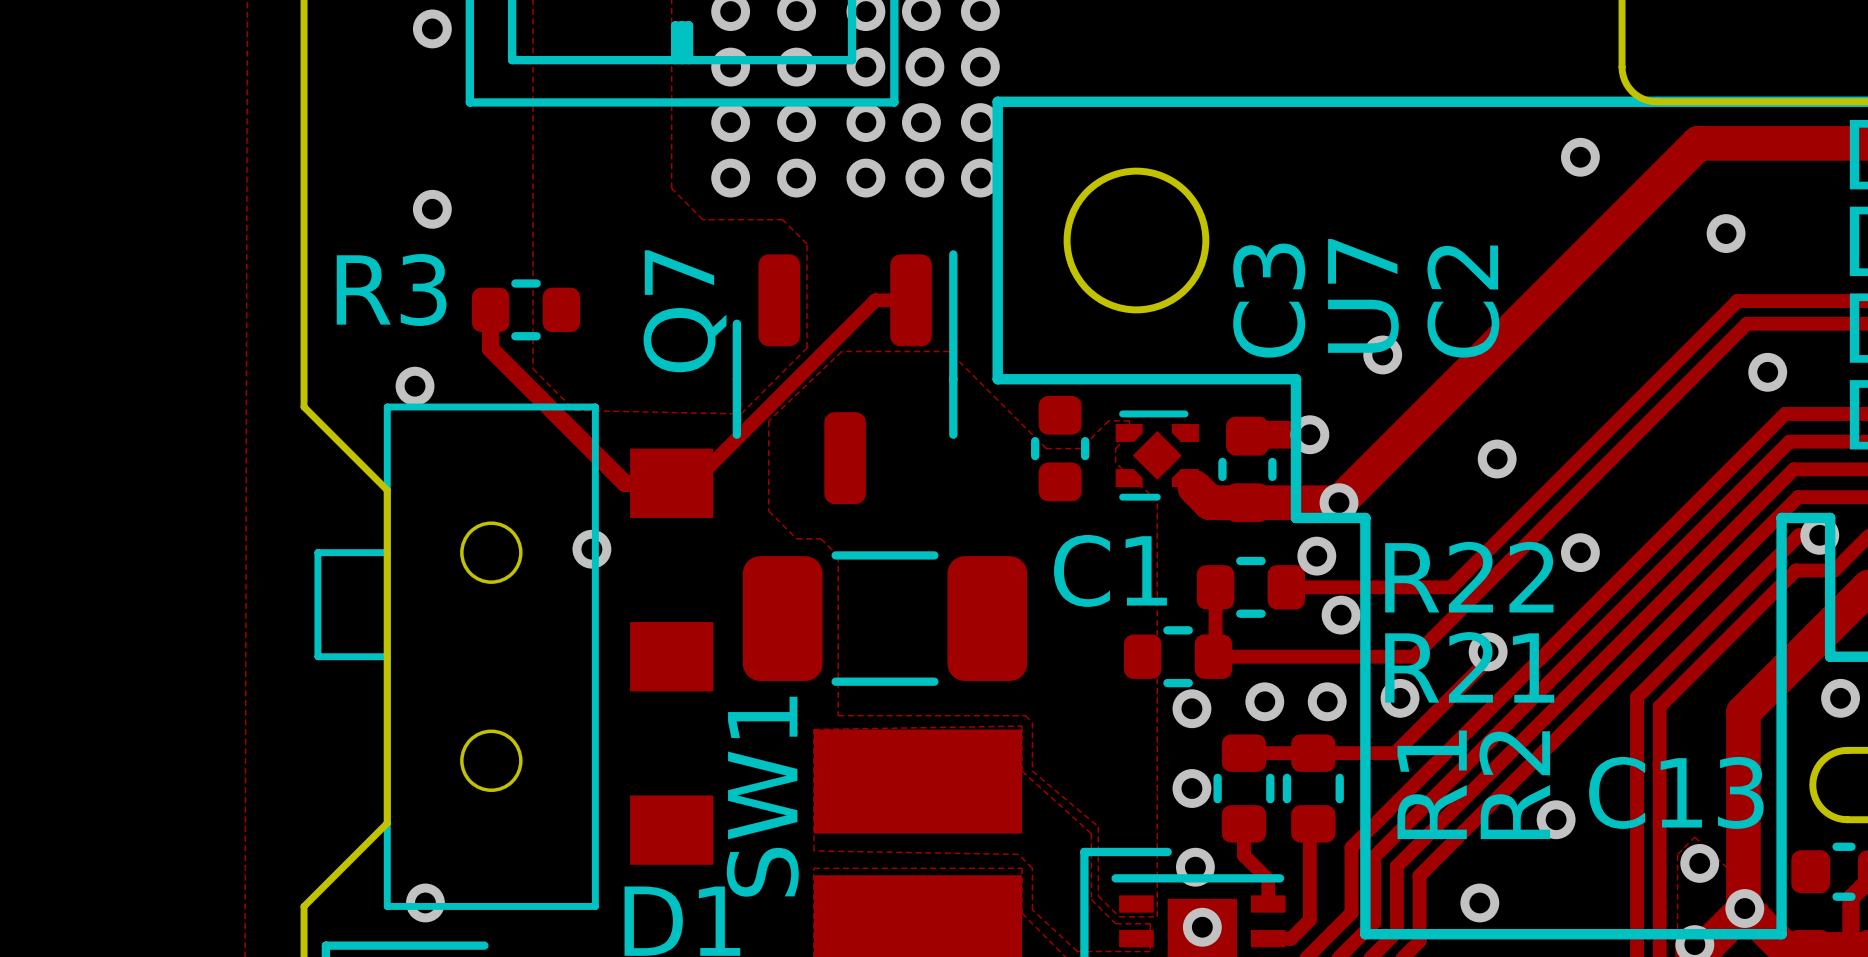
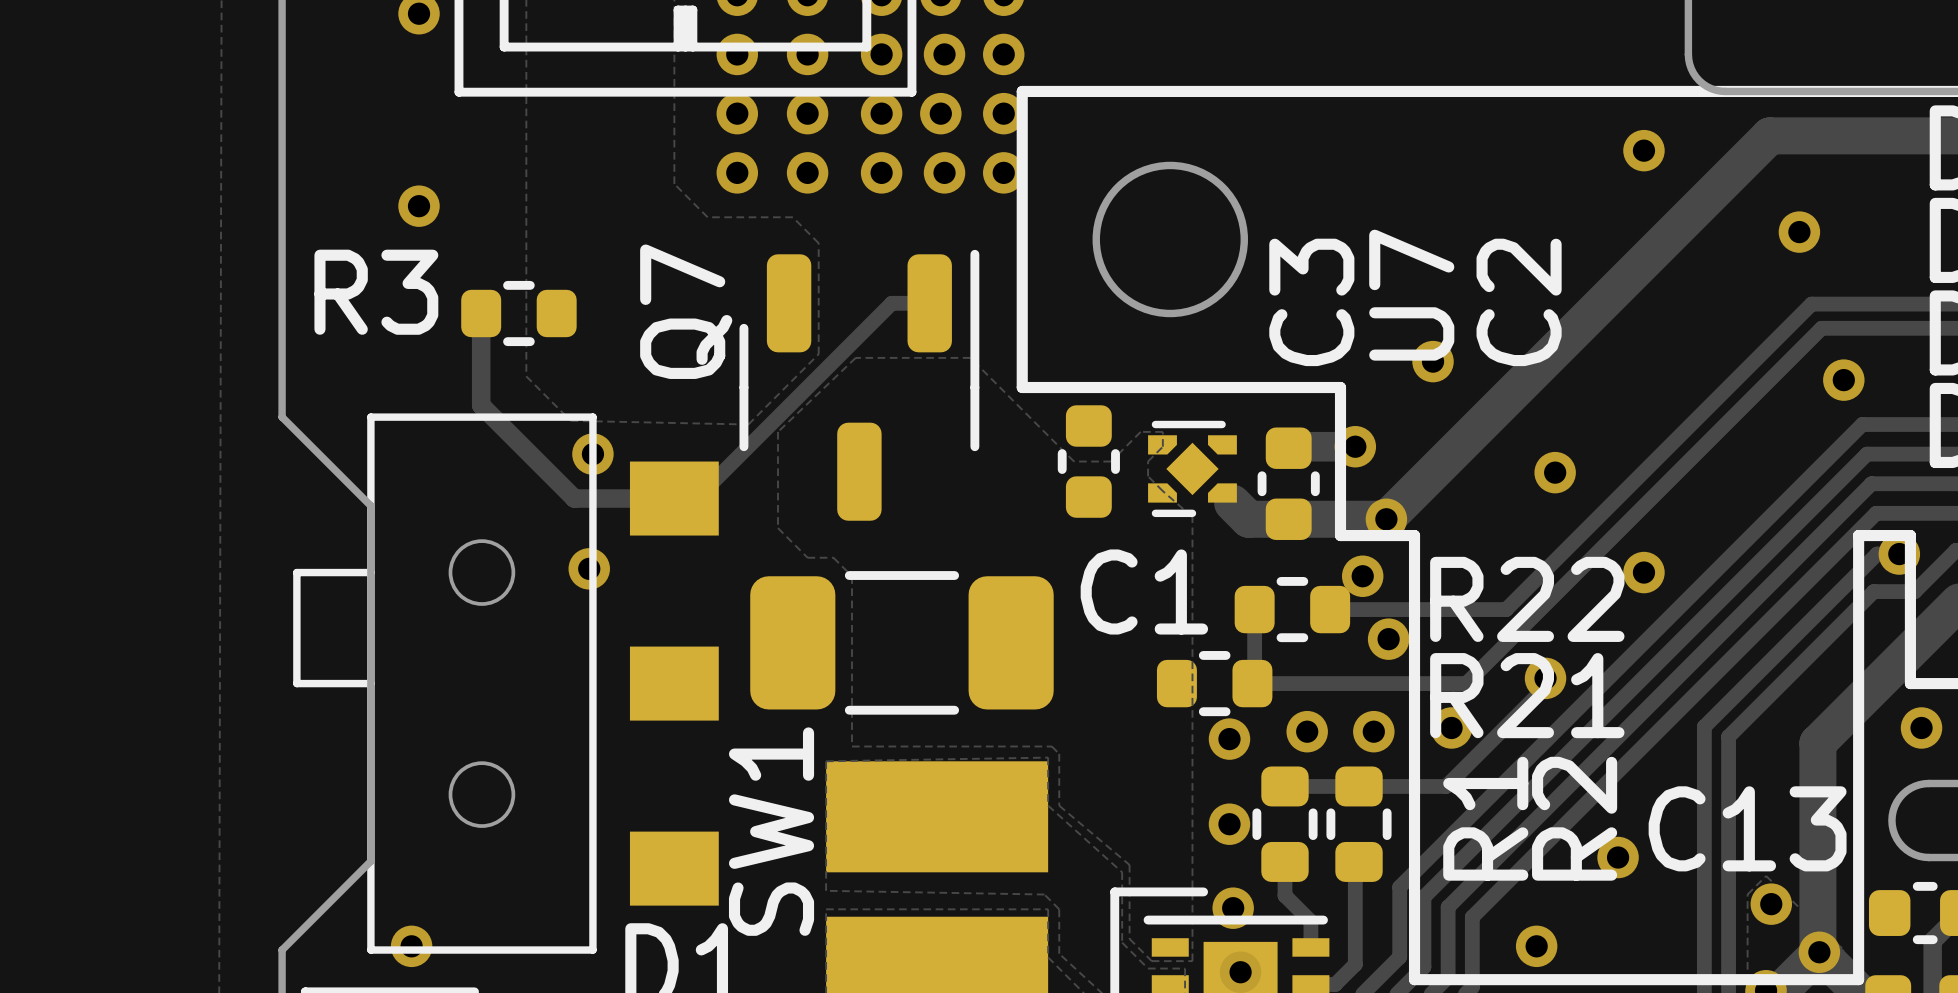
track: (490, 349) (624, 483) -> (481, 355) (481, 405) (574, 498) (624, 498)
via position: (415, 386) -> (592, 454)

